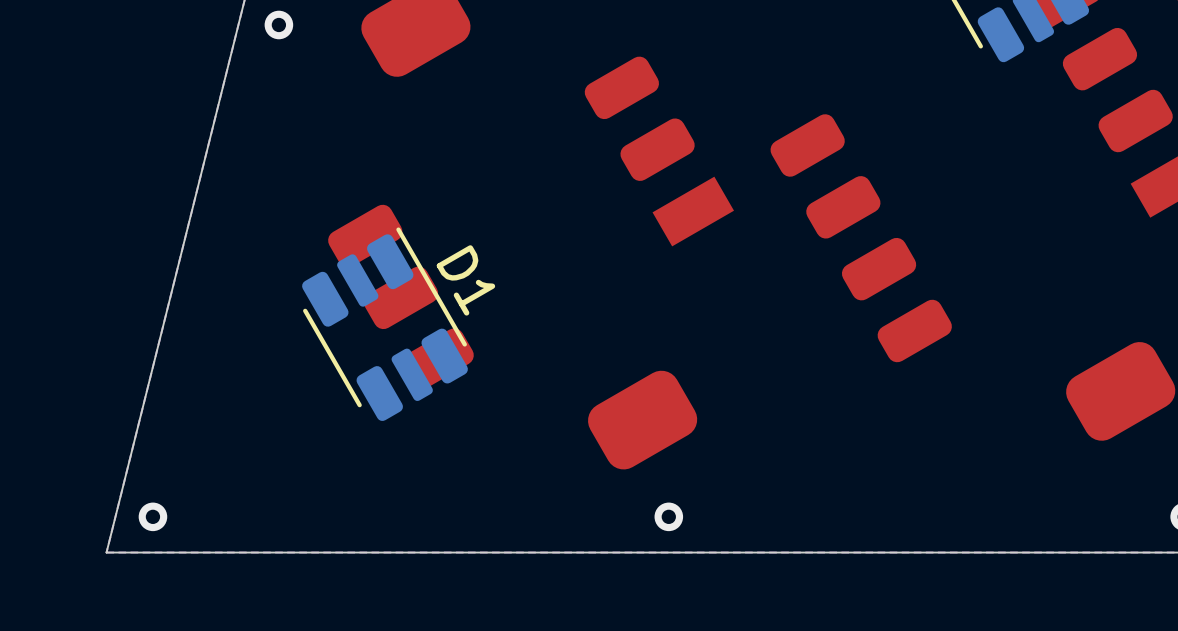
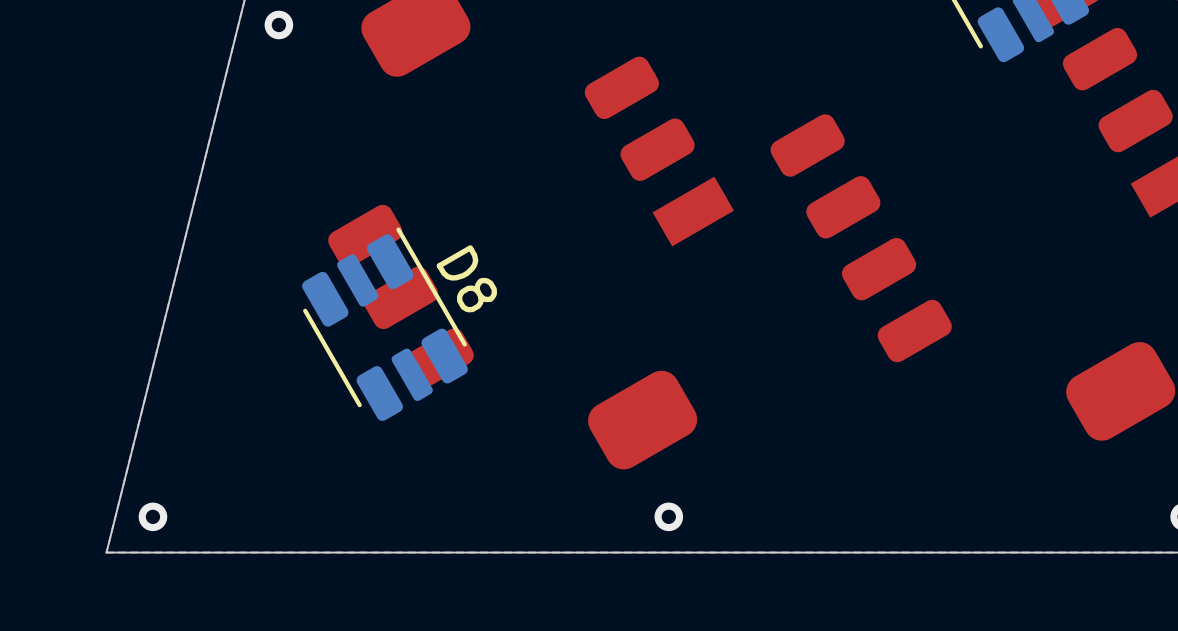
D1 name: D1 (465, 280) -> D8 (466, 278)

